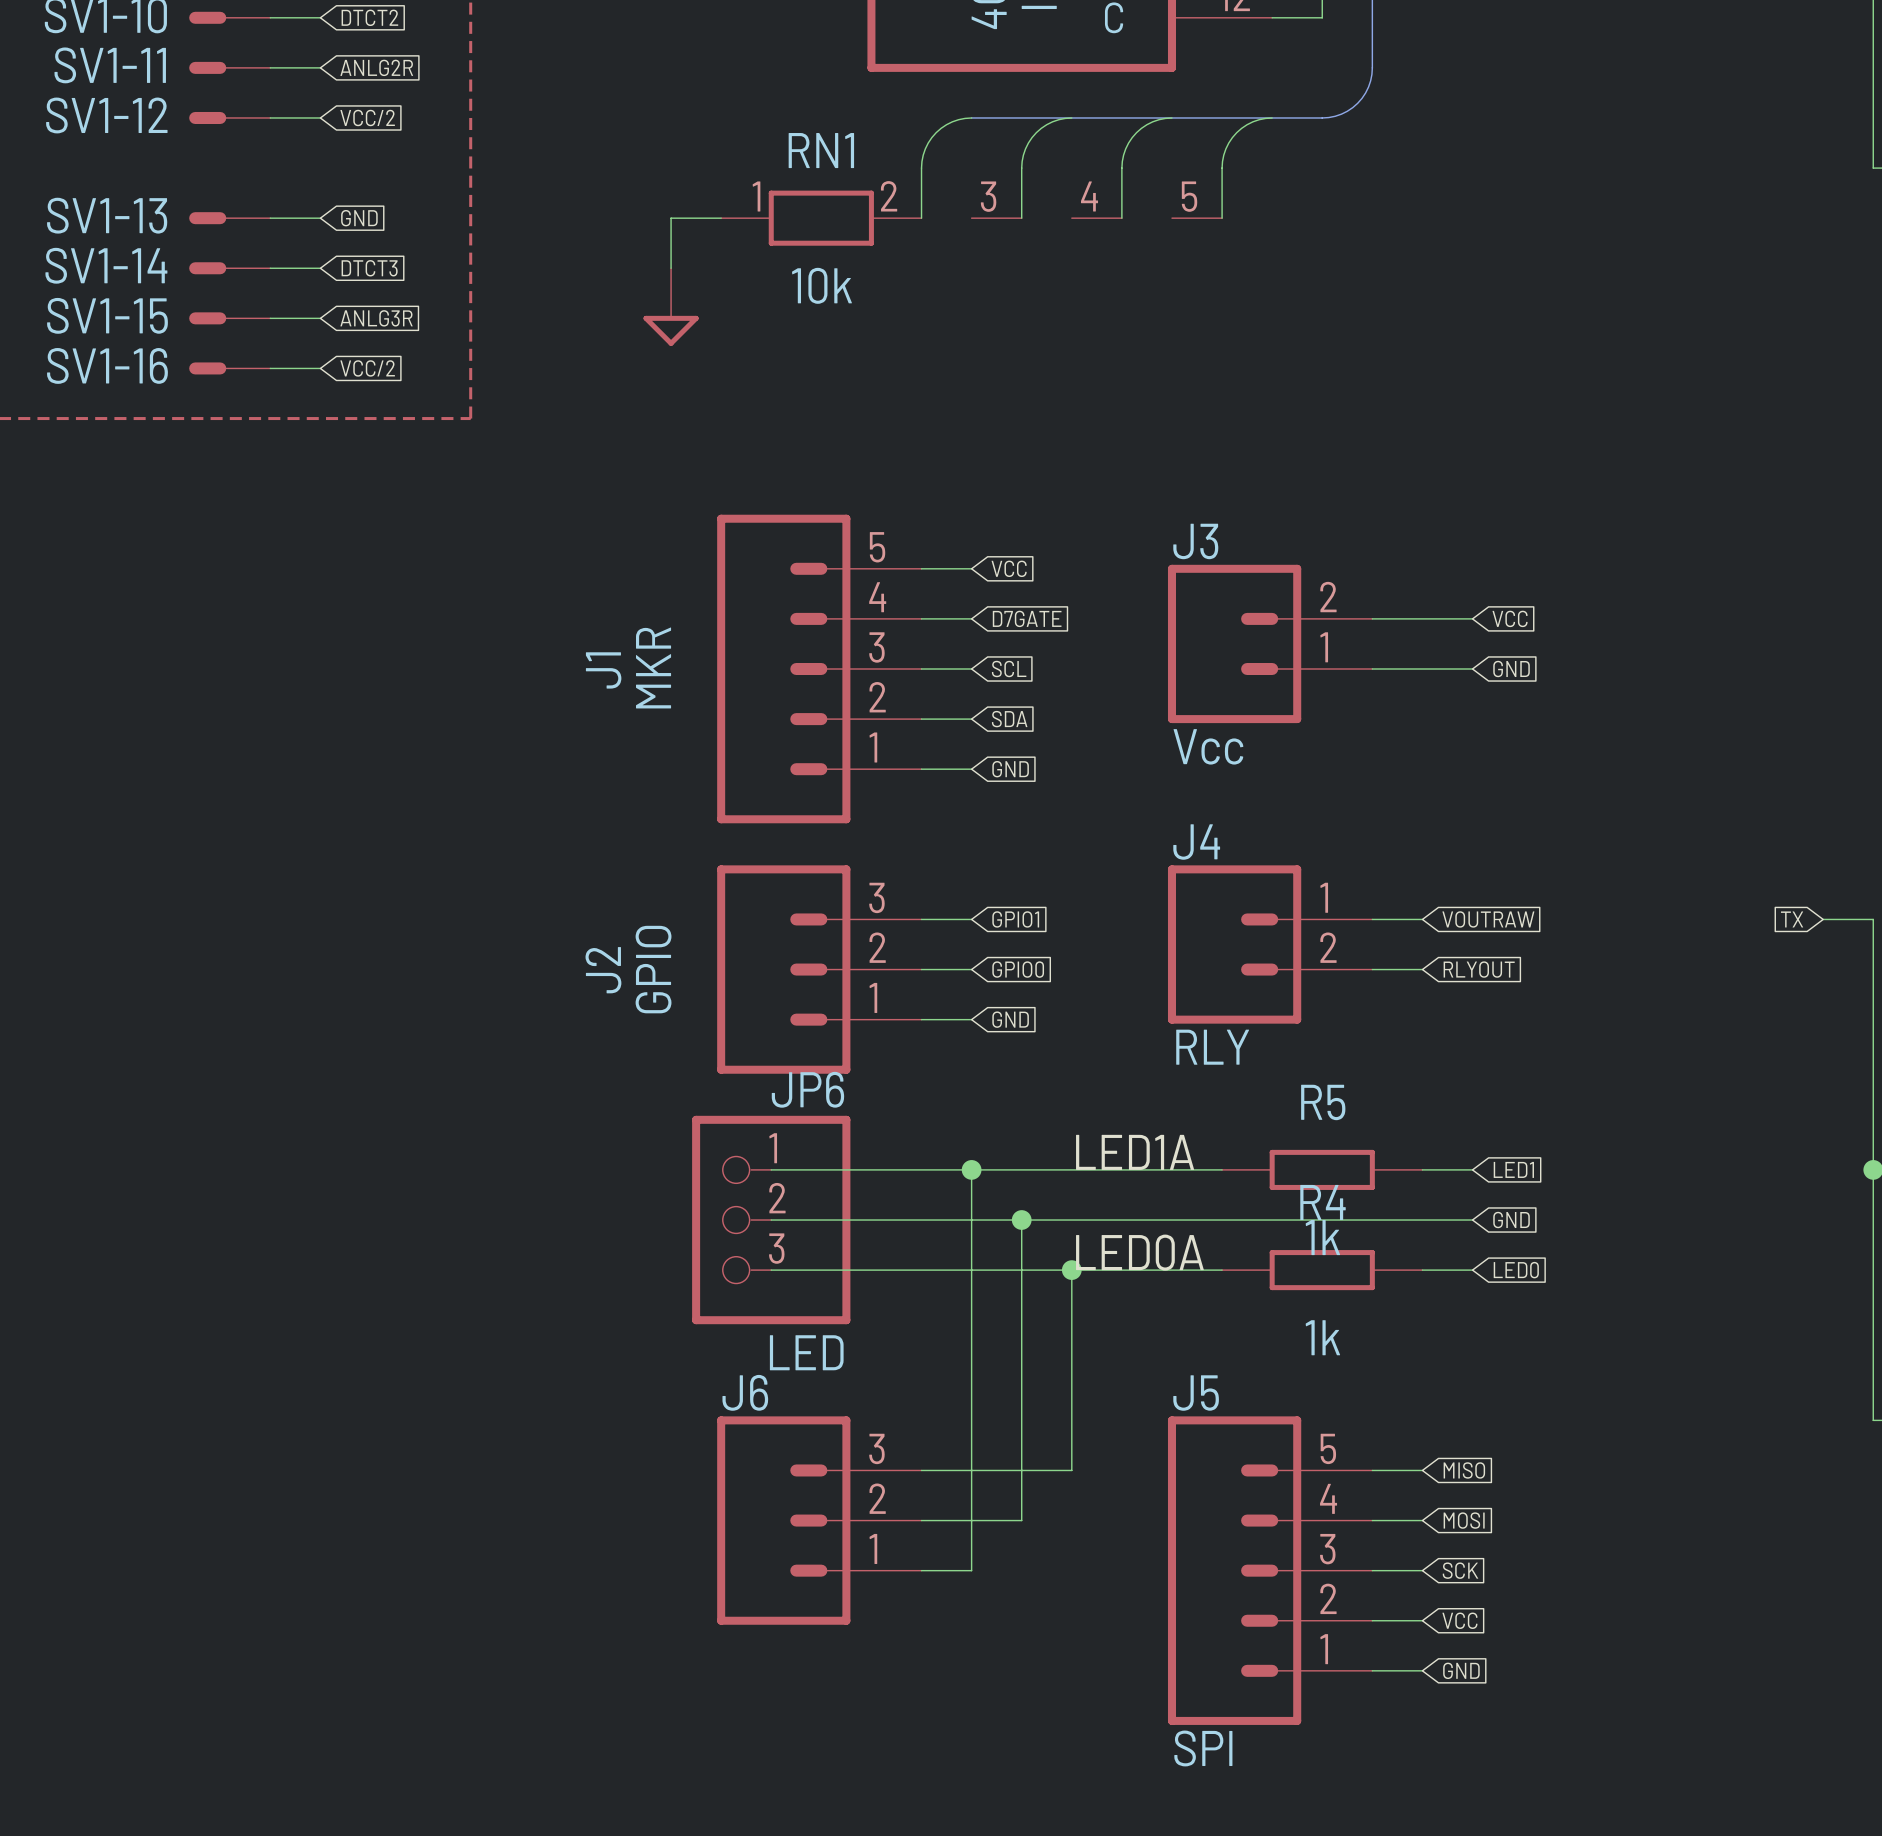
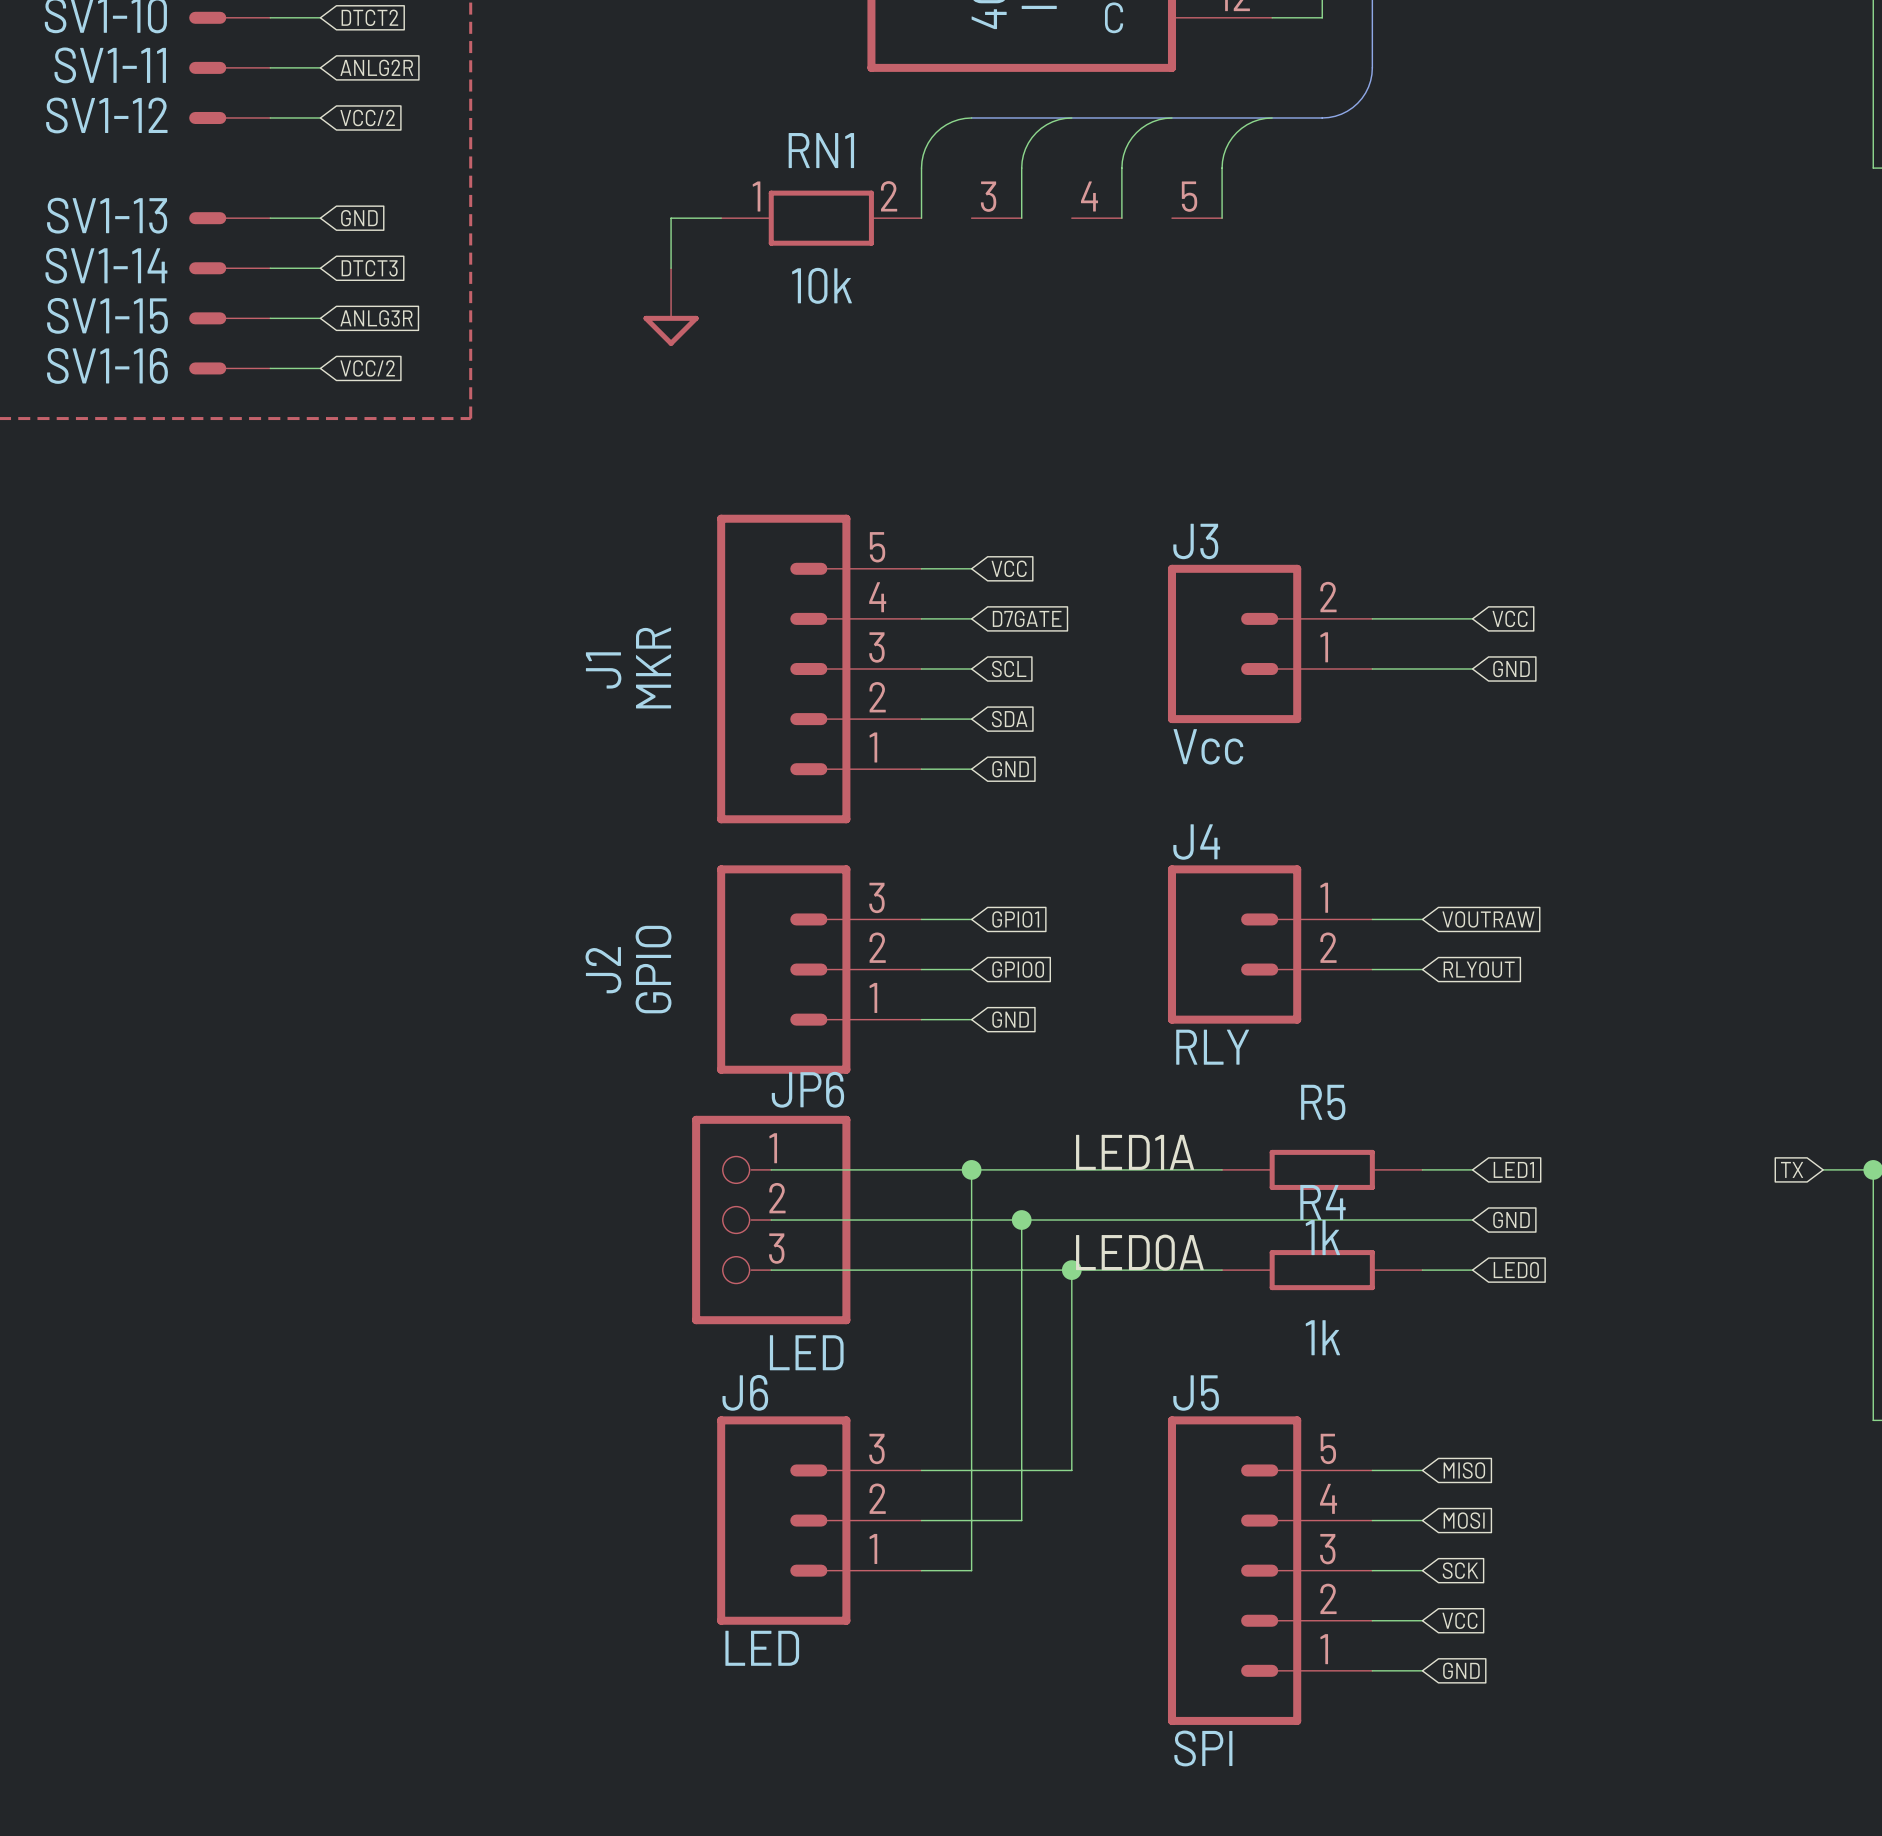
global label position: TX (1792, 919) -> TX (1792, 1169)
wire: (1823, 919) (1873, 919) (1873, 1169) -> (1823, 1169) (1873, 1169)
J6 value: none -> LED (762, 1648)

